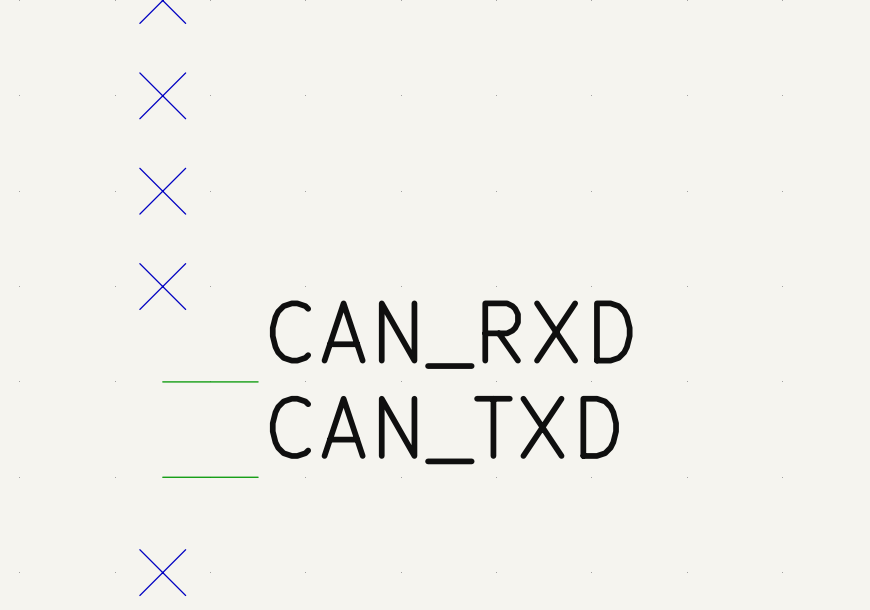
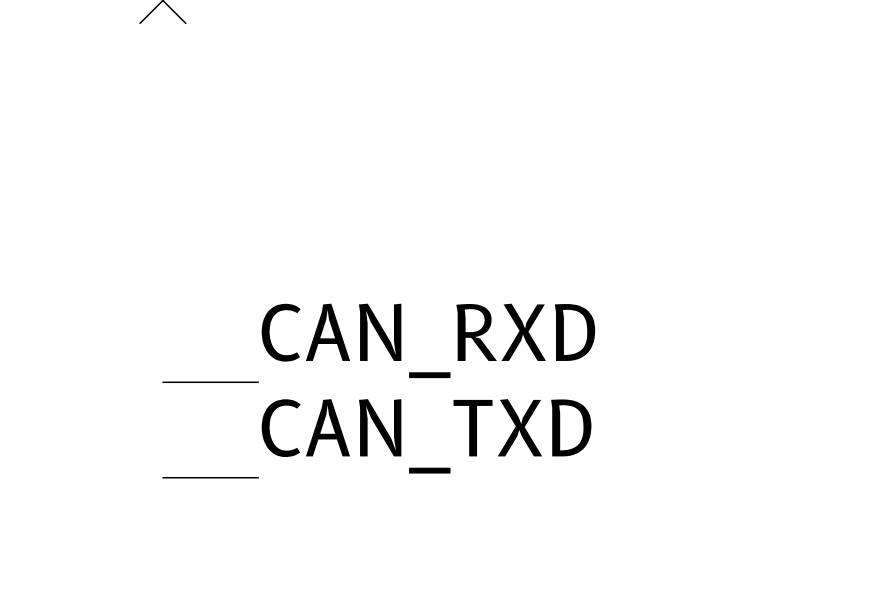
no-connect mark: (162, 95) -> none
no-connect mark: (162, 191) -> none
no-connect mark: (162, 286) -> none
no-connect mark: (162, 572) -> none

